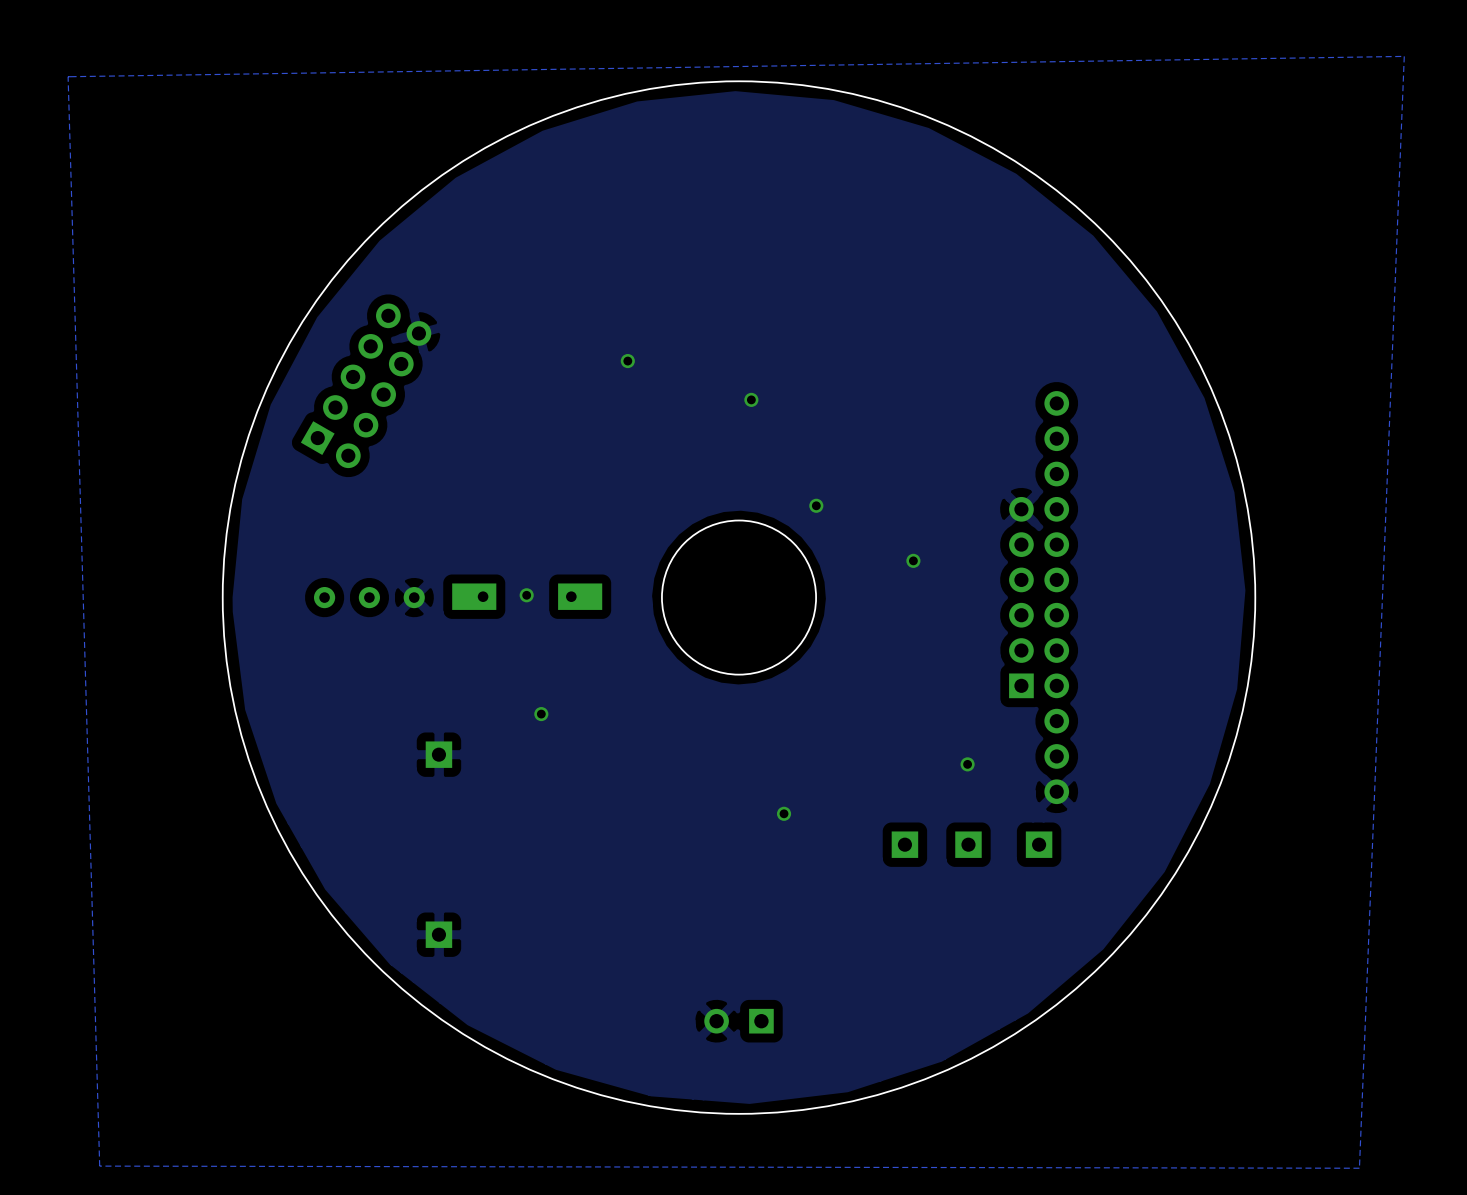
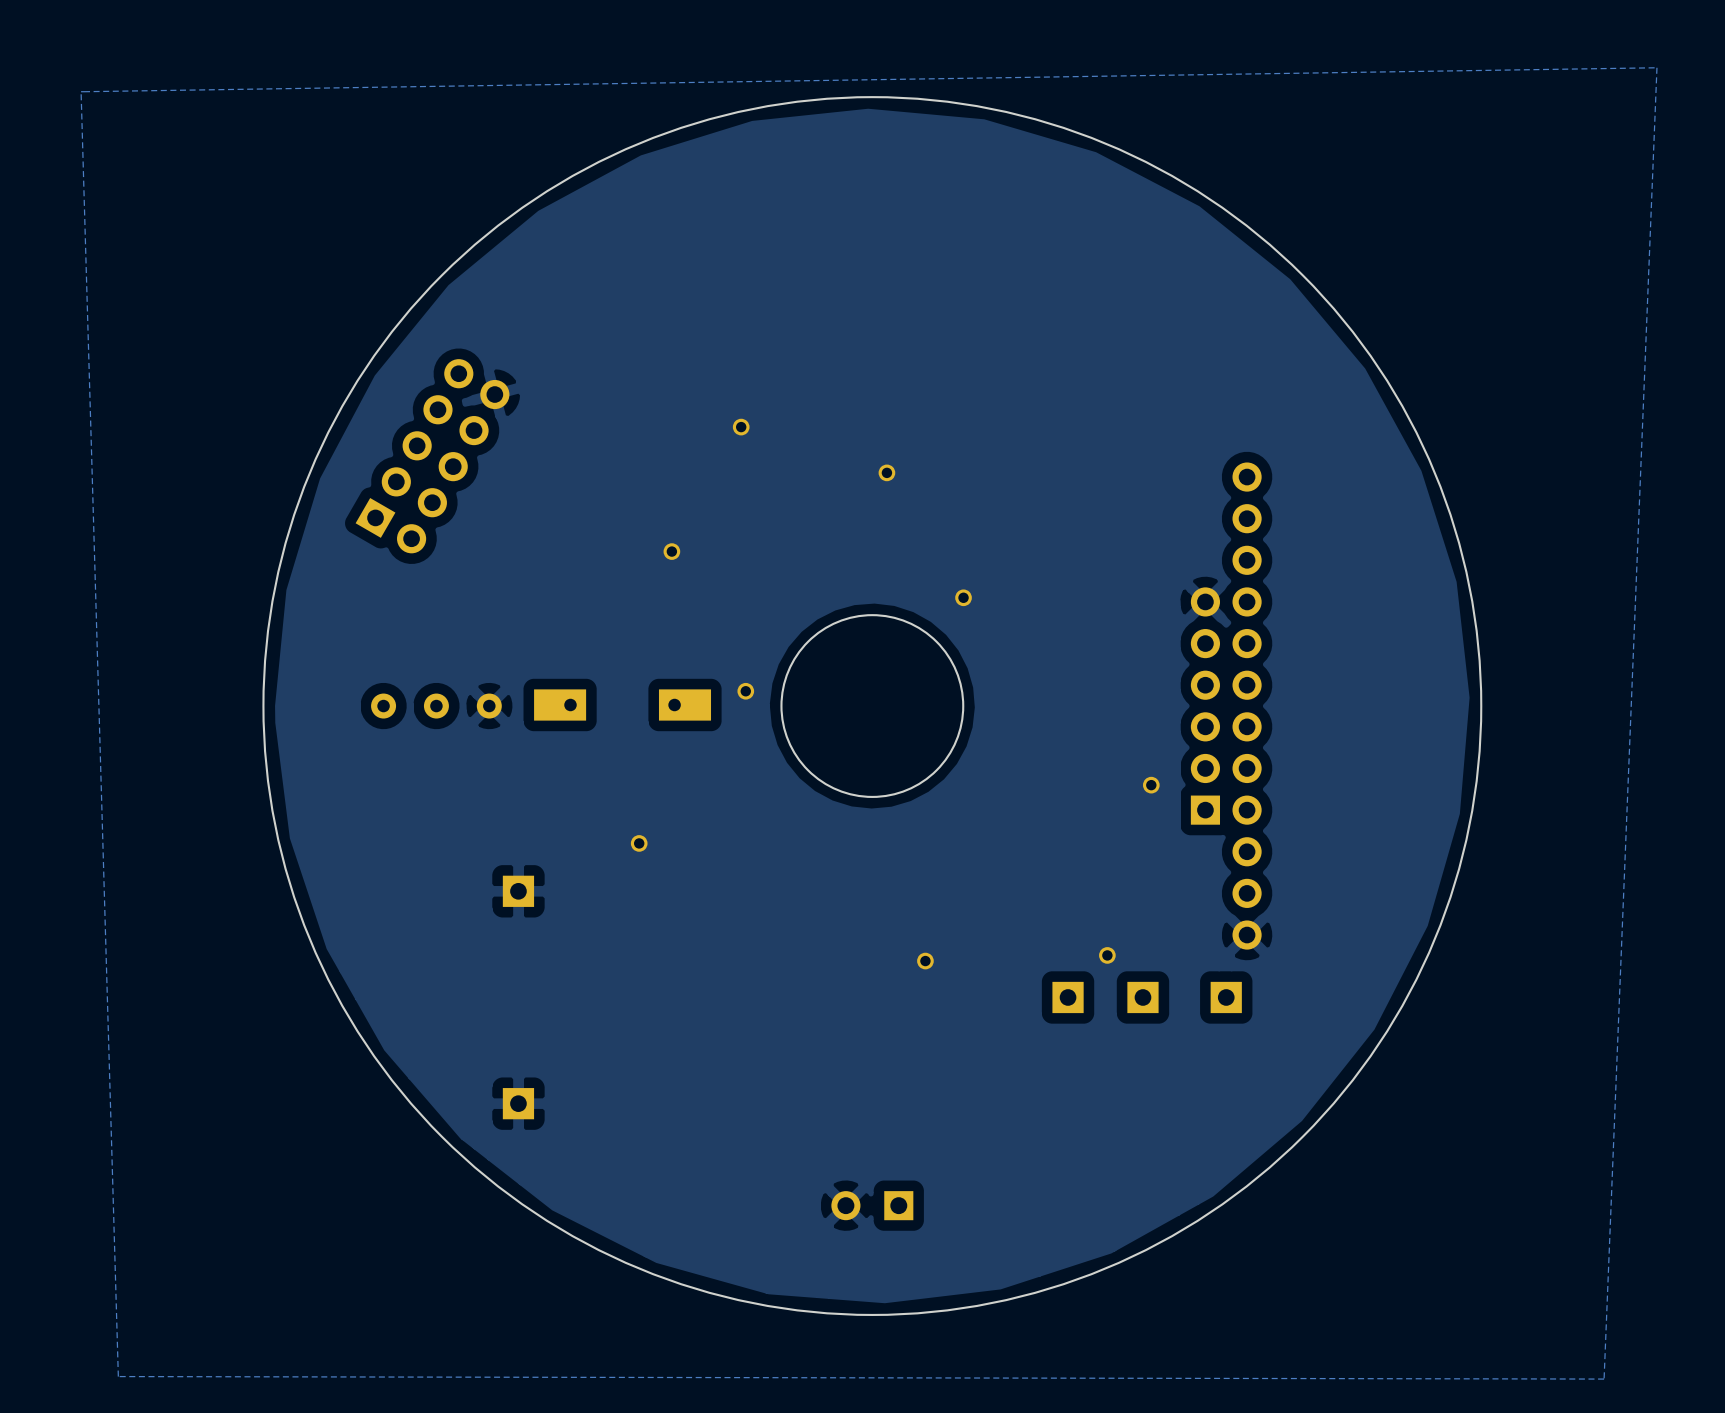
part: none -> (671, 551)
part: (913, 560) -> none
part: none -> (745, 691)
part: (526, 595) -> none
part: none -> (1151, 785)
part: (967, 764) -> none
part: none -> (1107, 955)

